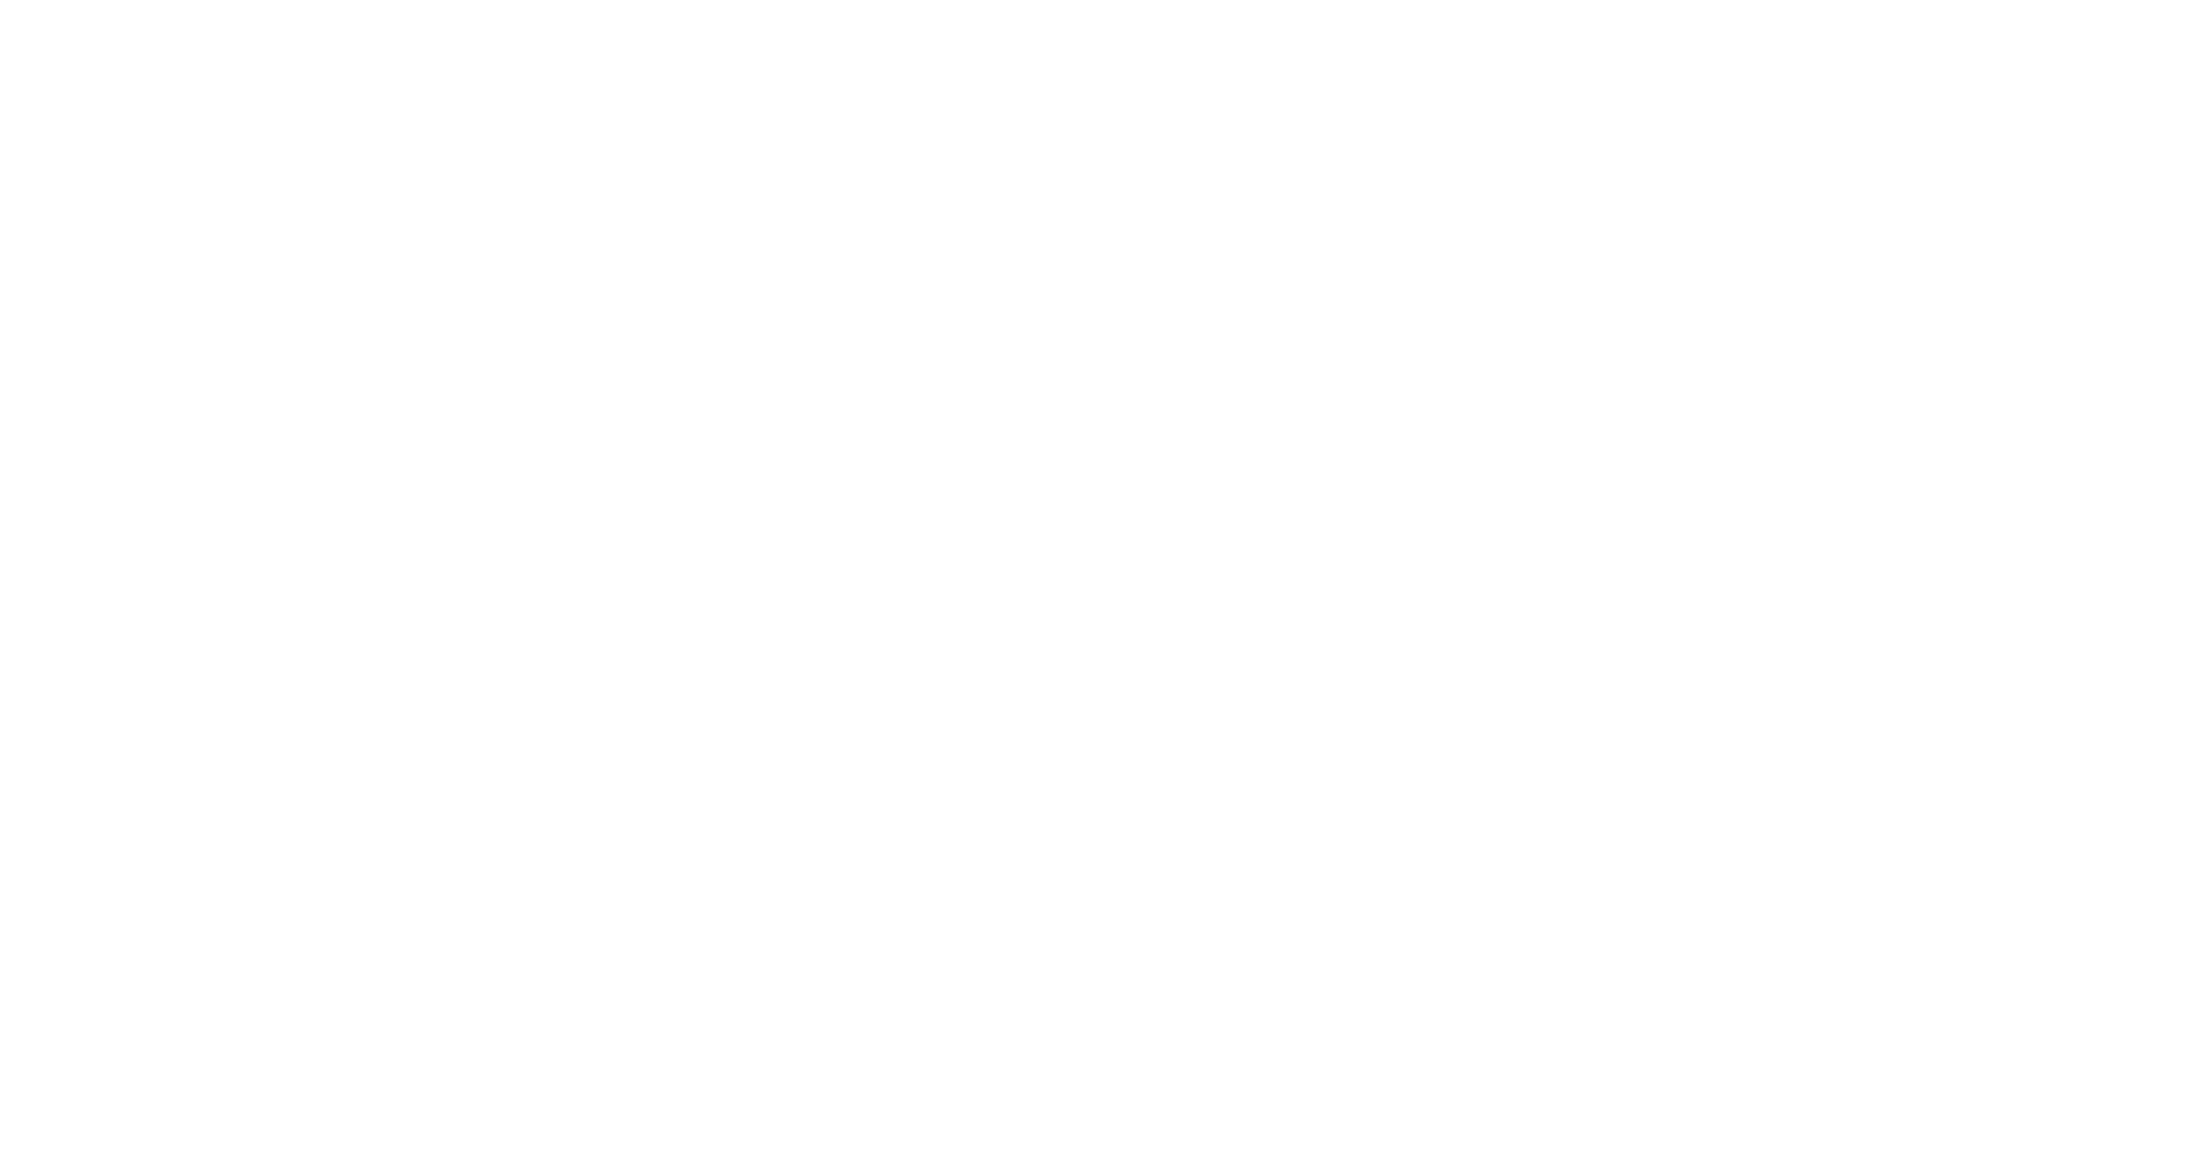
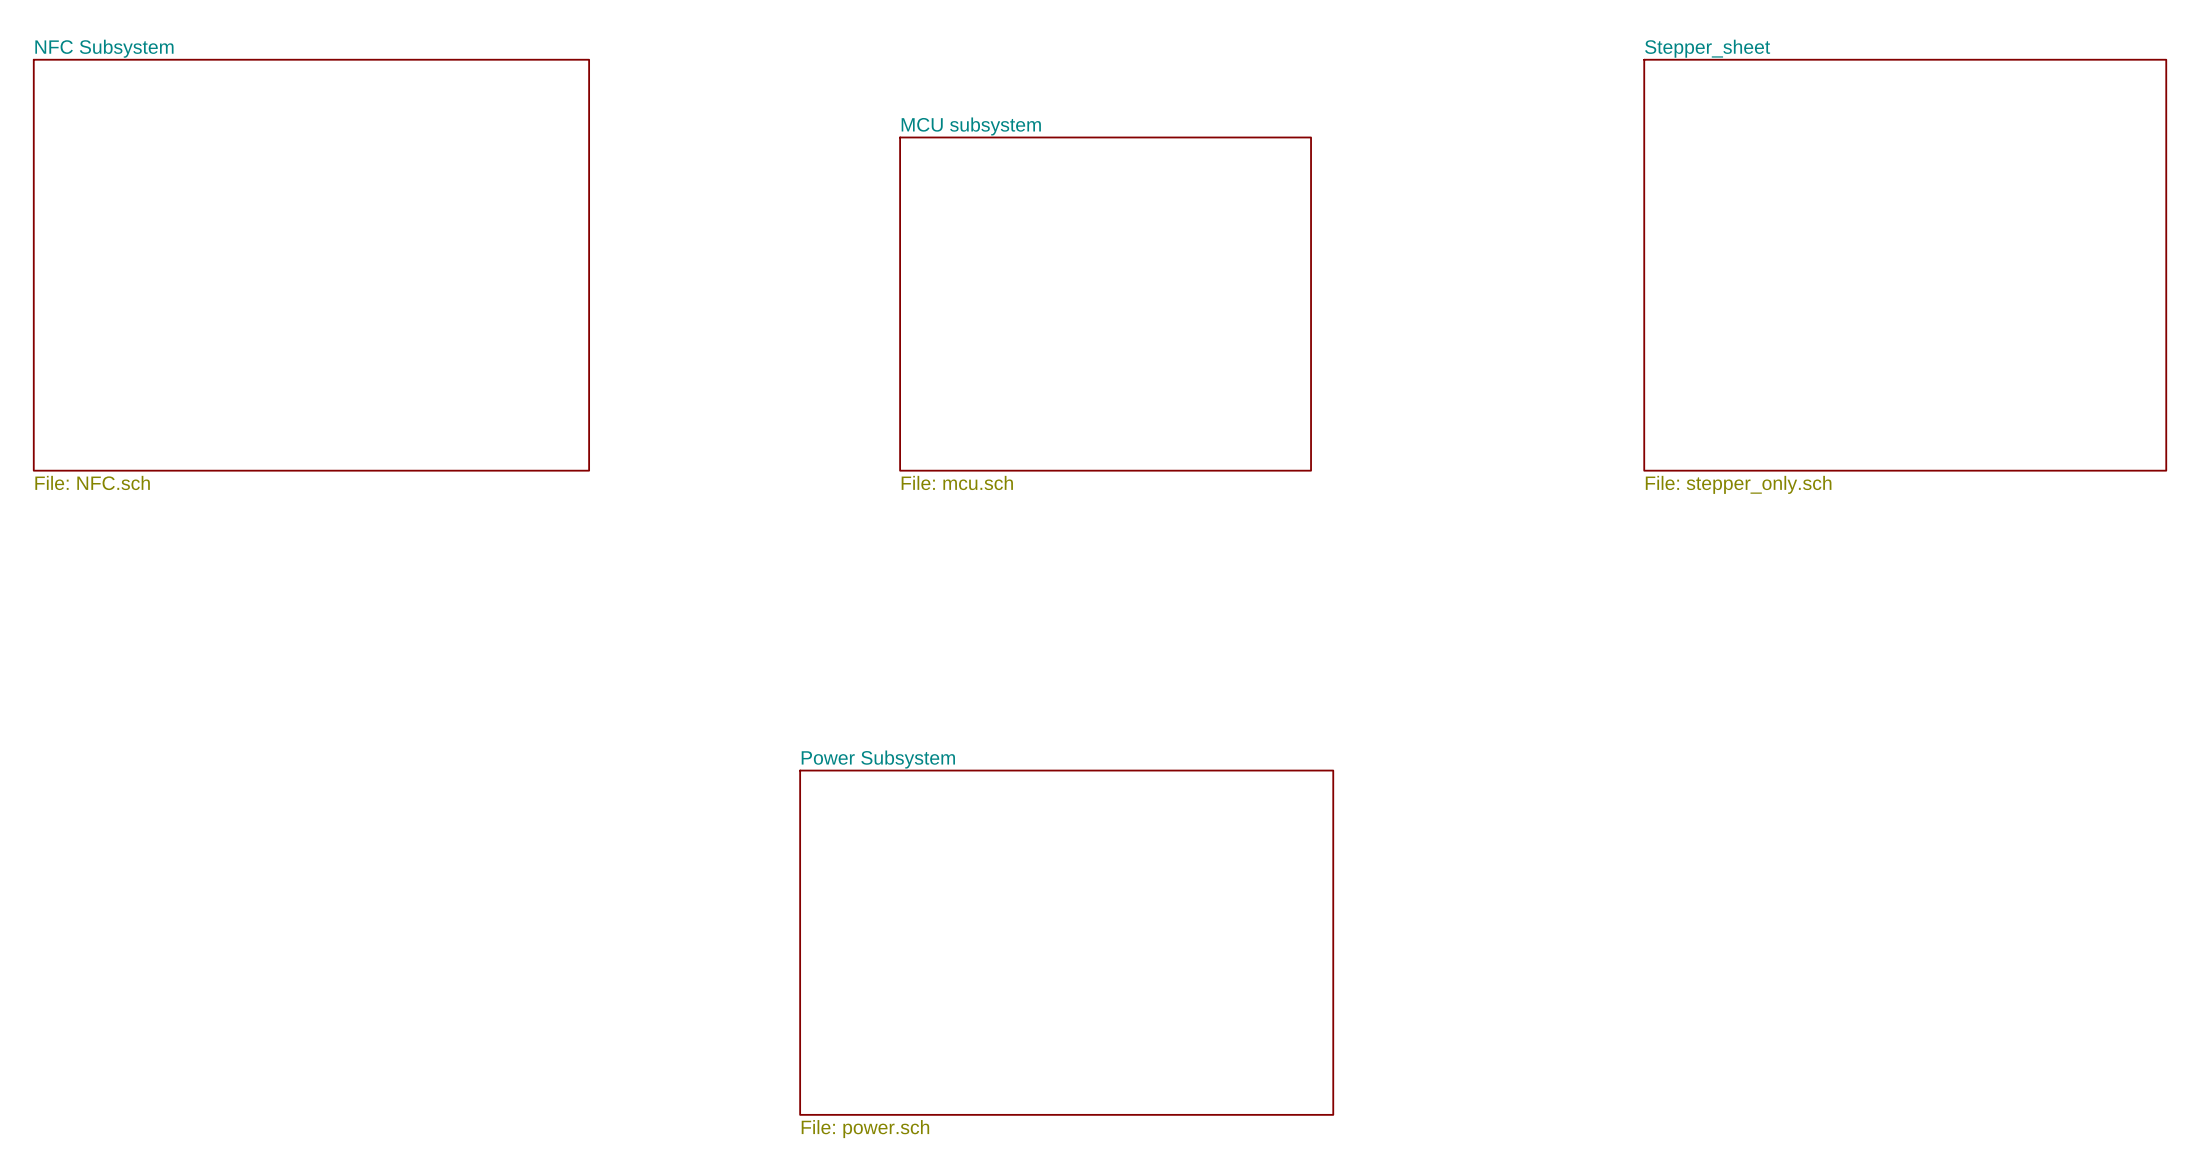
sheet NFC Subsystem: none -> File: NFC.sch (311, 265)
sheet Stepper_sheet: none -> File: stepper_only.sch (1905, 265)
sheet MCU subsystem: none -> File: mcu.sch (1105, 304)
sheet Power Subsystem: none -> File: power.sch (1066, 942)

